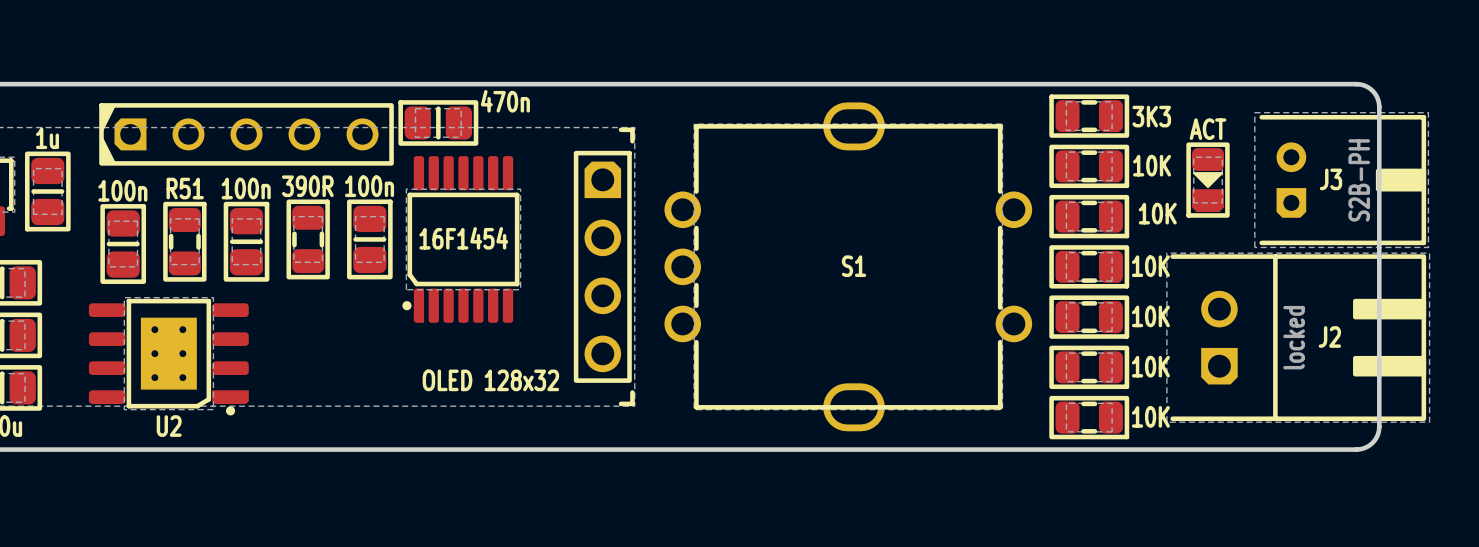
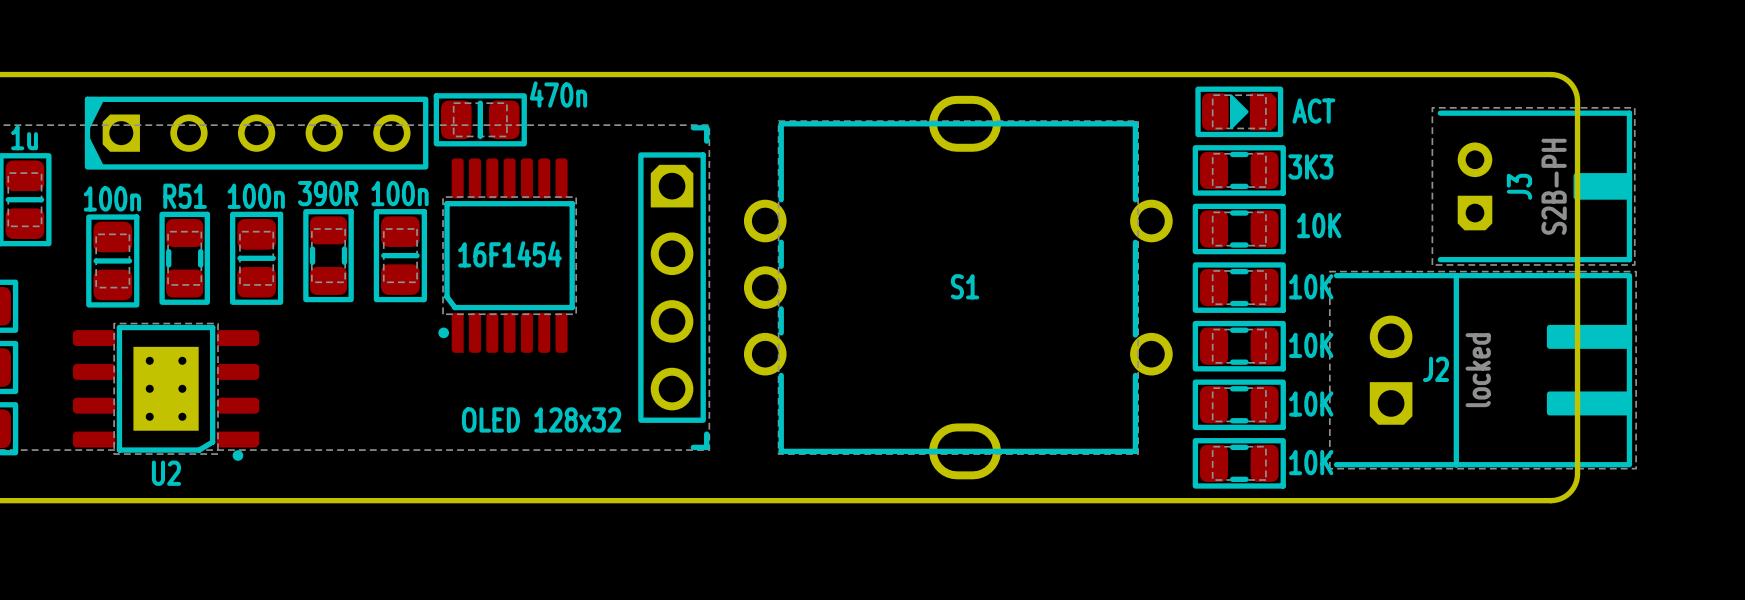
part footprint: [1049, 94, 1130, 138] -> [1195, 86, 1284, 138]
part value: 3K3 (1151, 116) -> ACT (1313, 111)
part value: 10K (1152, 165) -> 3K3 (1310, 166)
J3 name rotation: 0° (1331, 179) -> 90° counterclockwise (1519, 186)
part: ACT (1208, 180) -> none
J2 name position: J2 (1329, 336) -> J2 (1436, 369)

